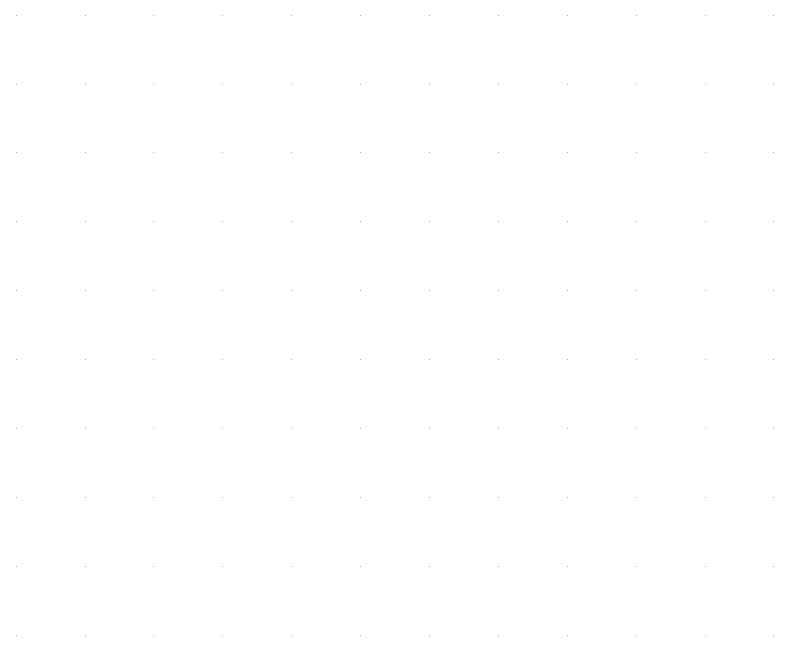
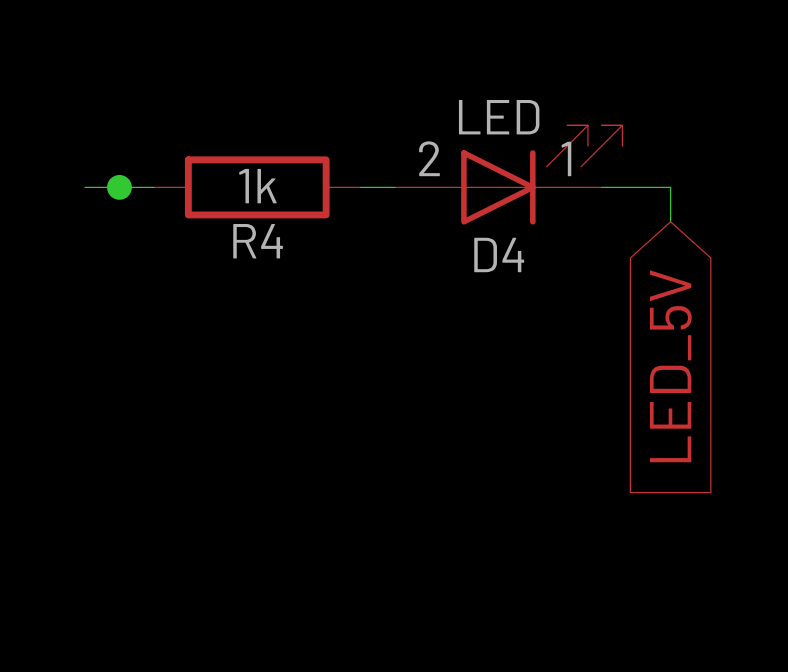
D4: none -> LED (508, 174)
wire: none -> (85, 187) (153, 187)
junction: none -> (119, 187)
R4: none -> 1k (257, 187)
wire: none -> (360, 187) (395, 187)
wire: none -> (601, 187) (670, 187) (670, 221)
global label: none -> LED_5V (670, 366)

